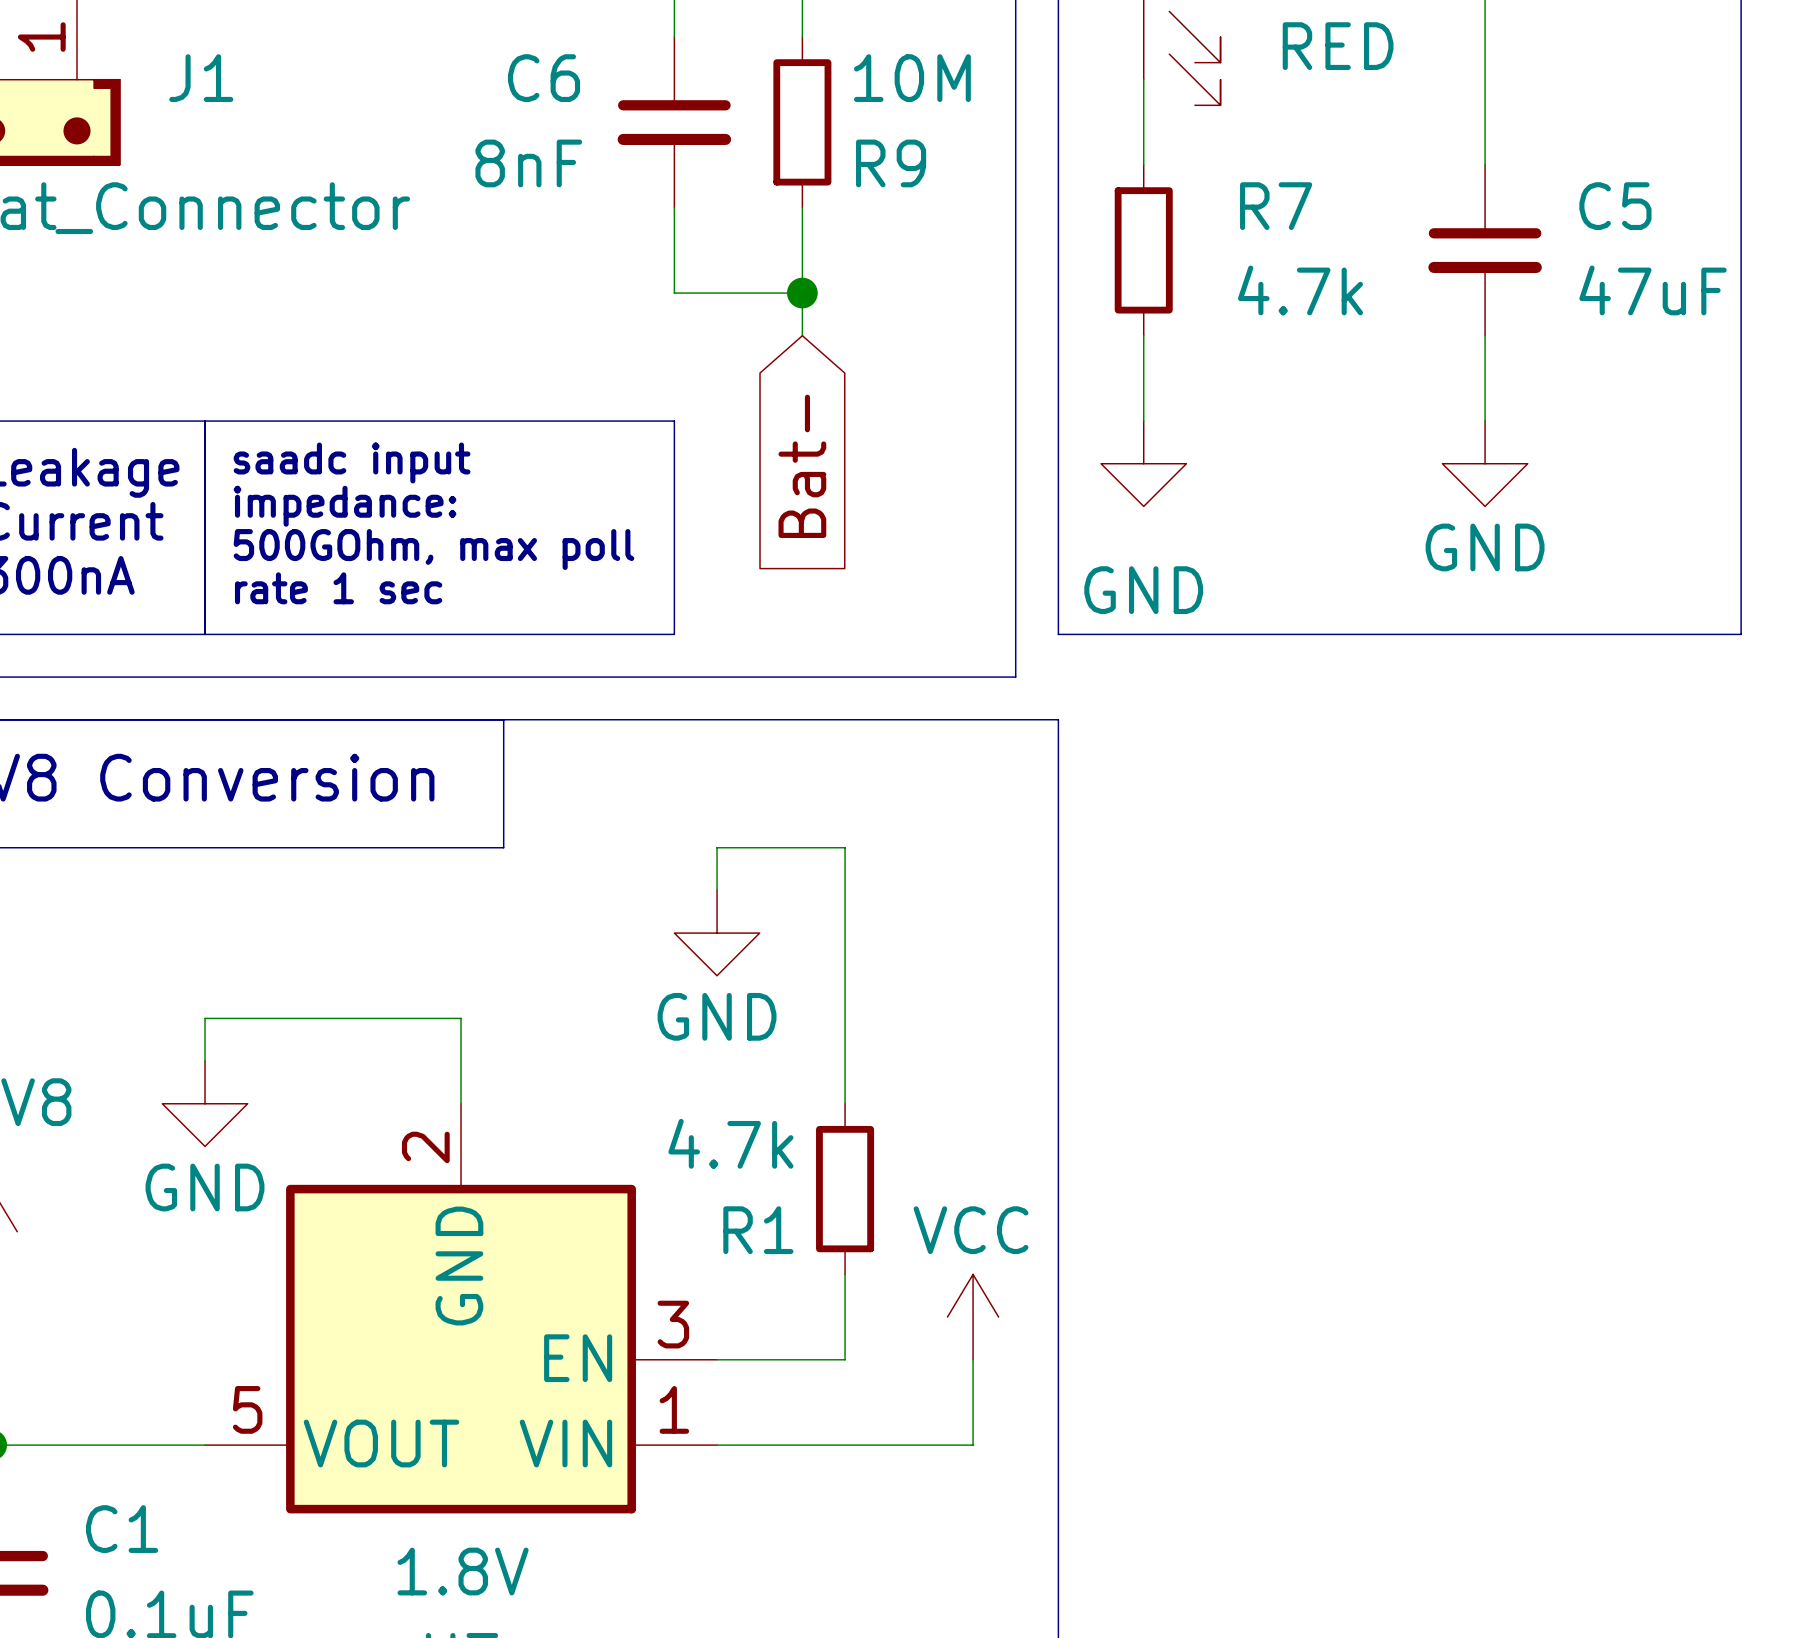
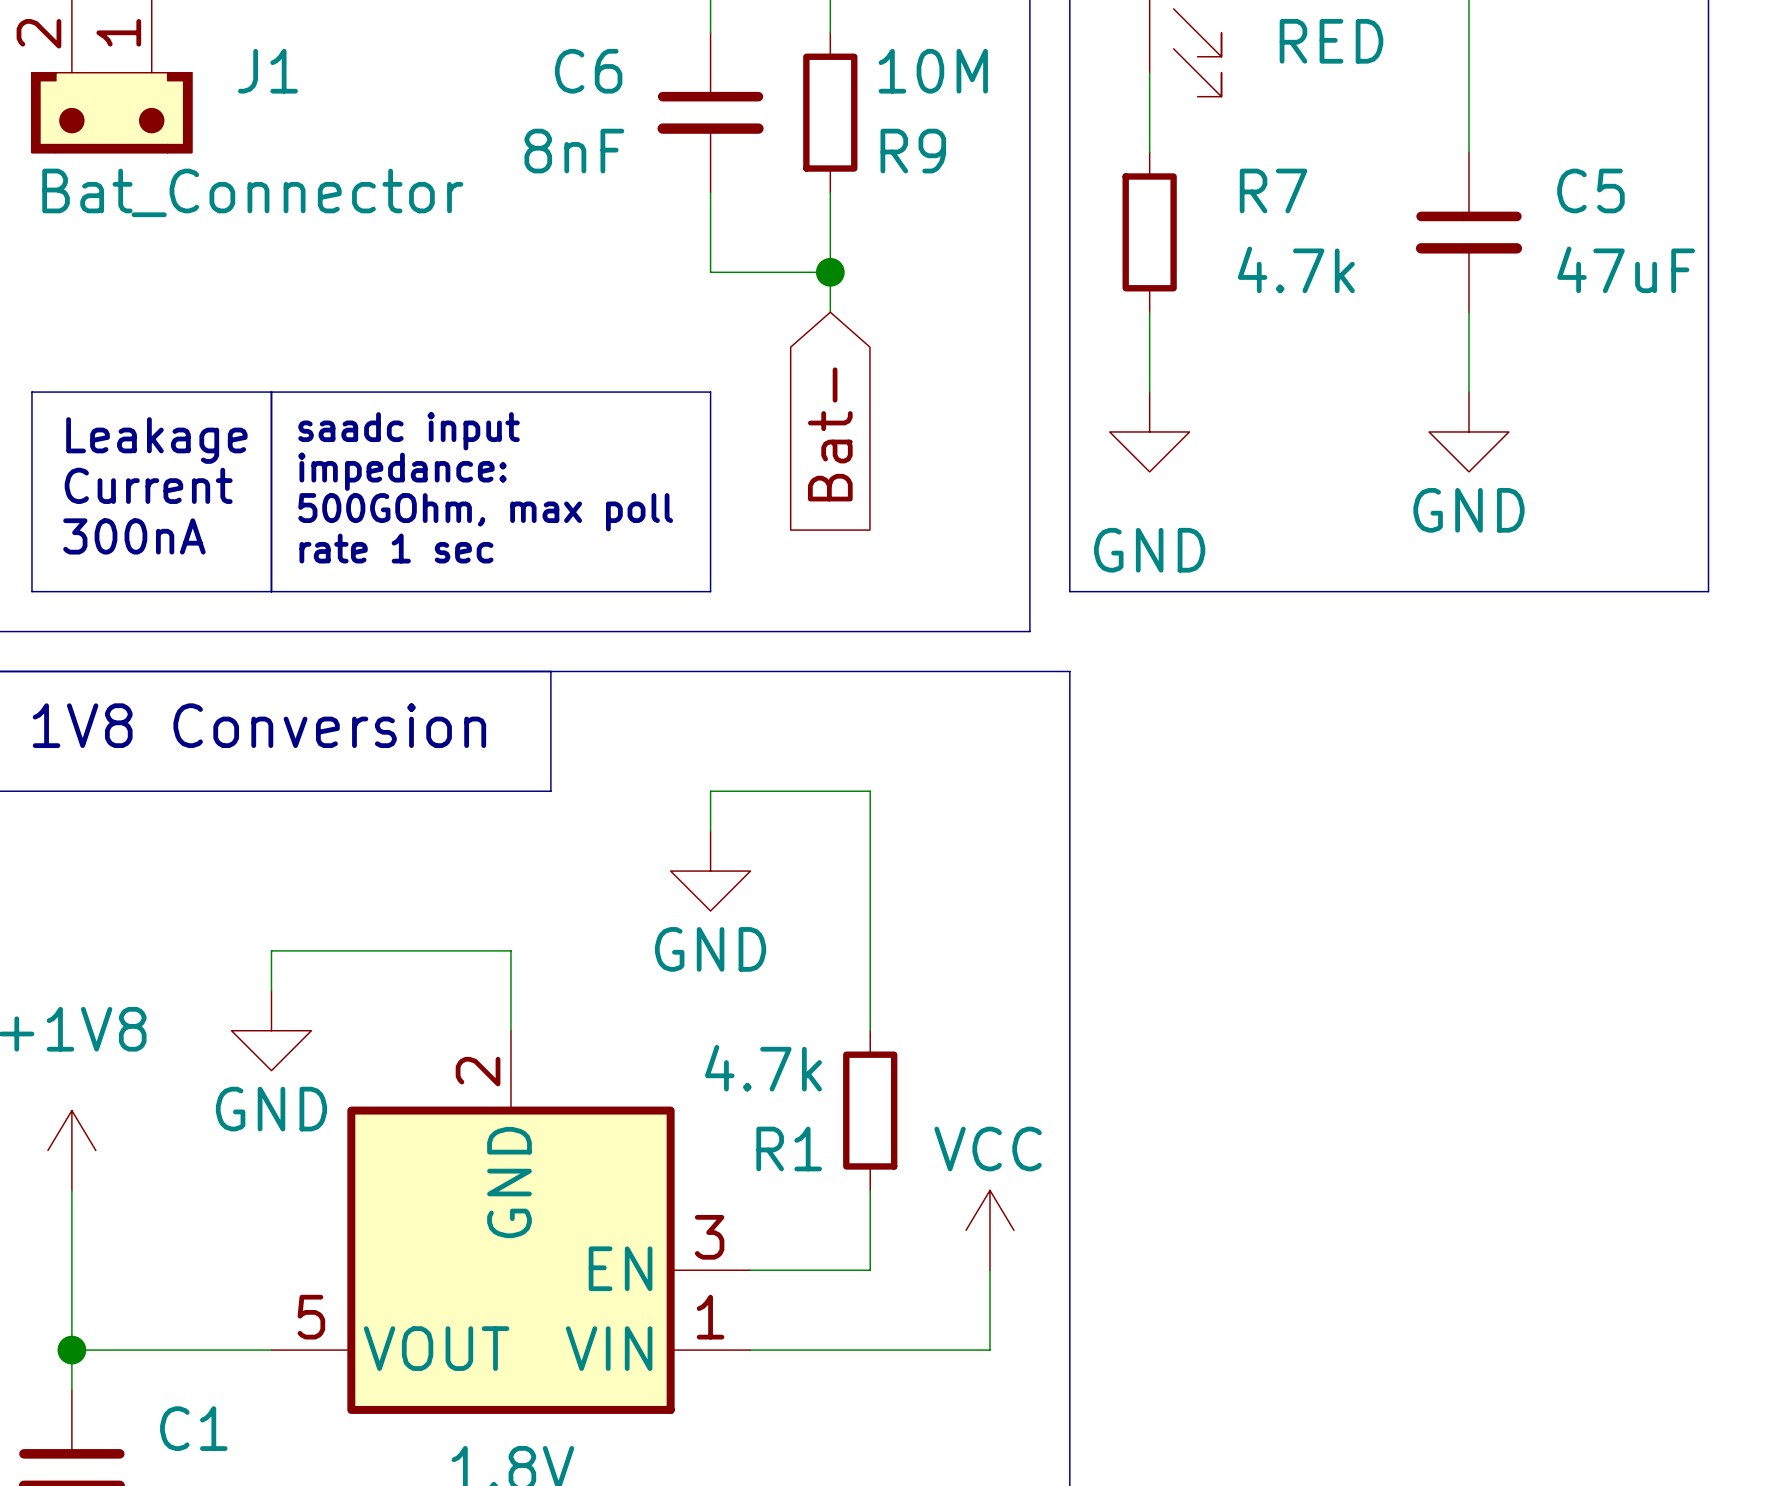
wire: (717, 847) (717, 890) -> (750, 791) (710, 791) (710, 831)
power symbol position: GND (717, 933) -> GND (710, 871)

